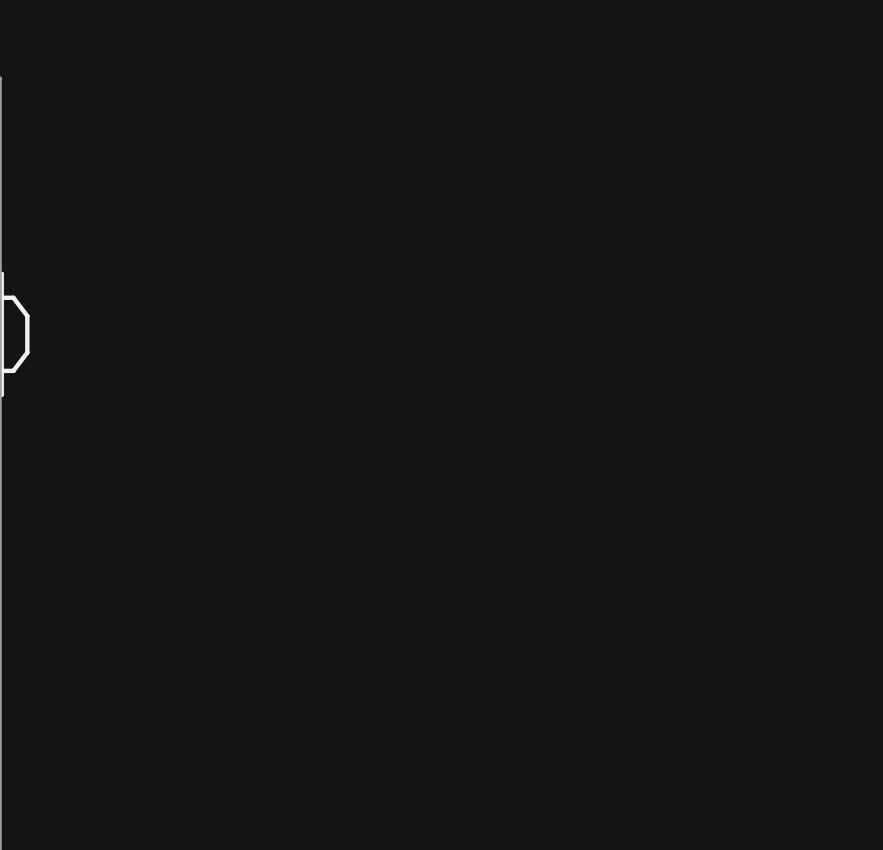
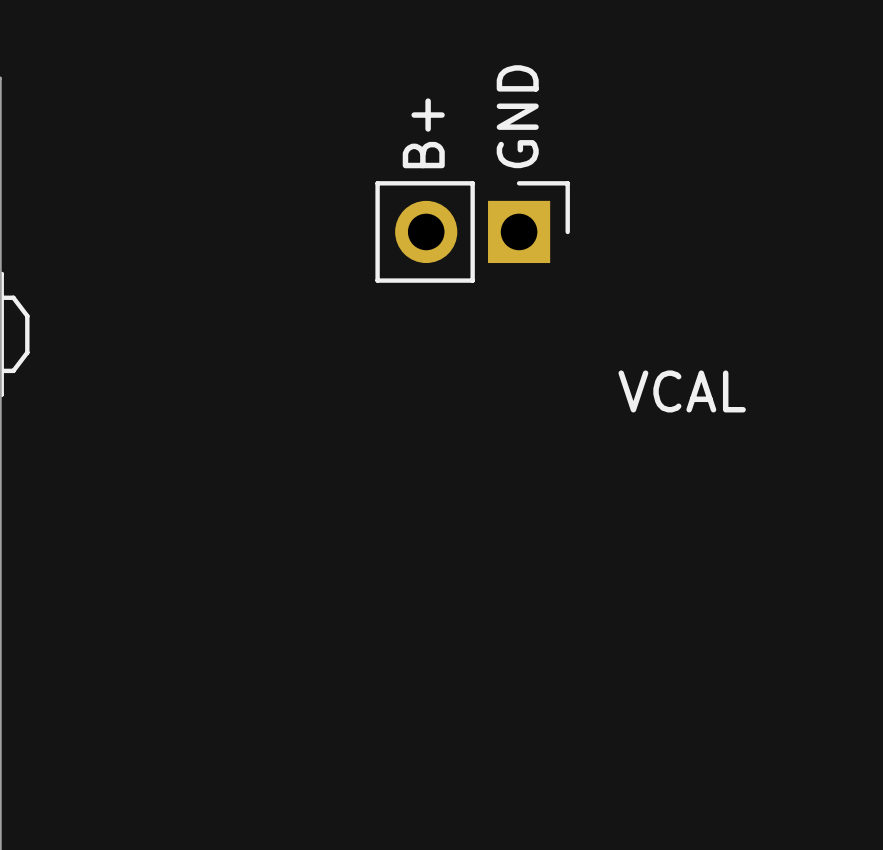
text: none -> GND (517, 116)
text: none -> B+ (423, 133)
part: none -> (472, 231)
text: none -> VCAL (682, 391)

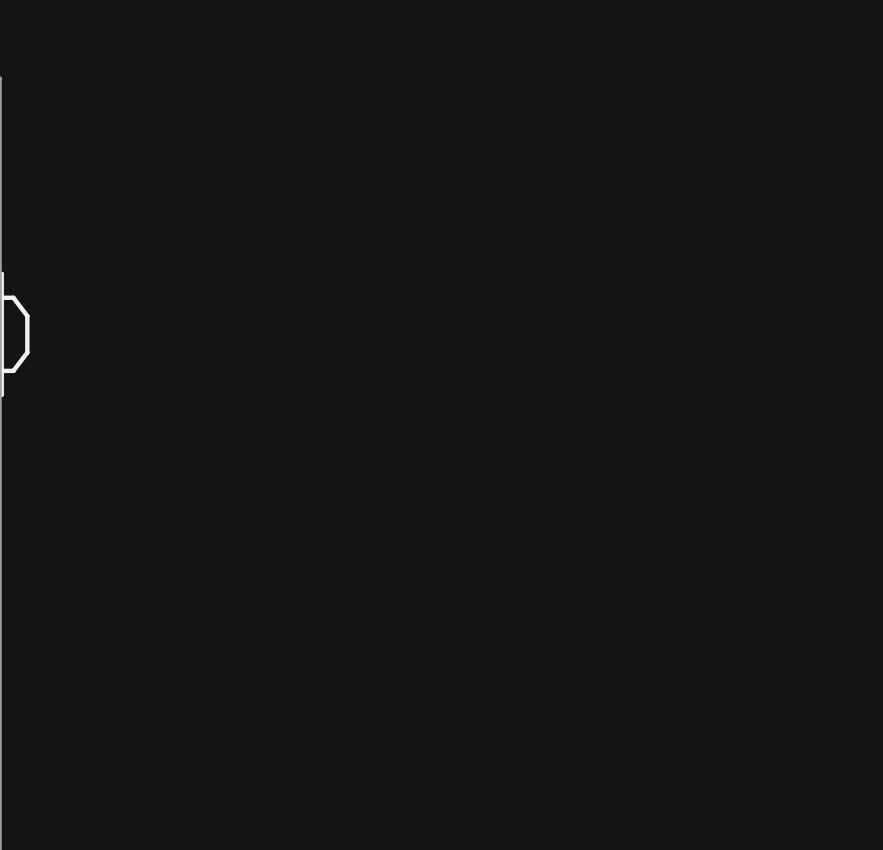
text: GND (517, 116) -> none
text: B+ (423, 133) -> none
part: (472, 231) -> none
text: VCAL (682, 391) -> none

